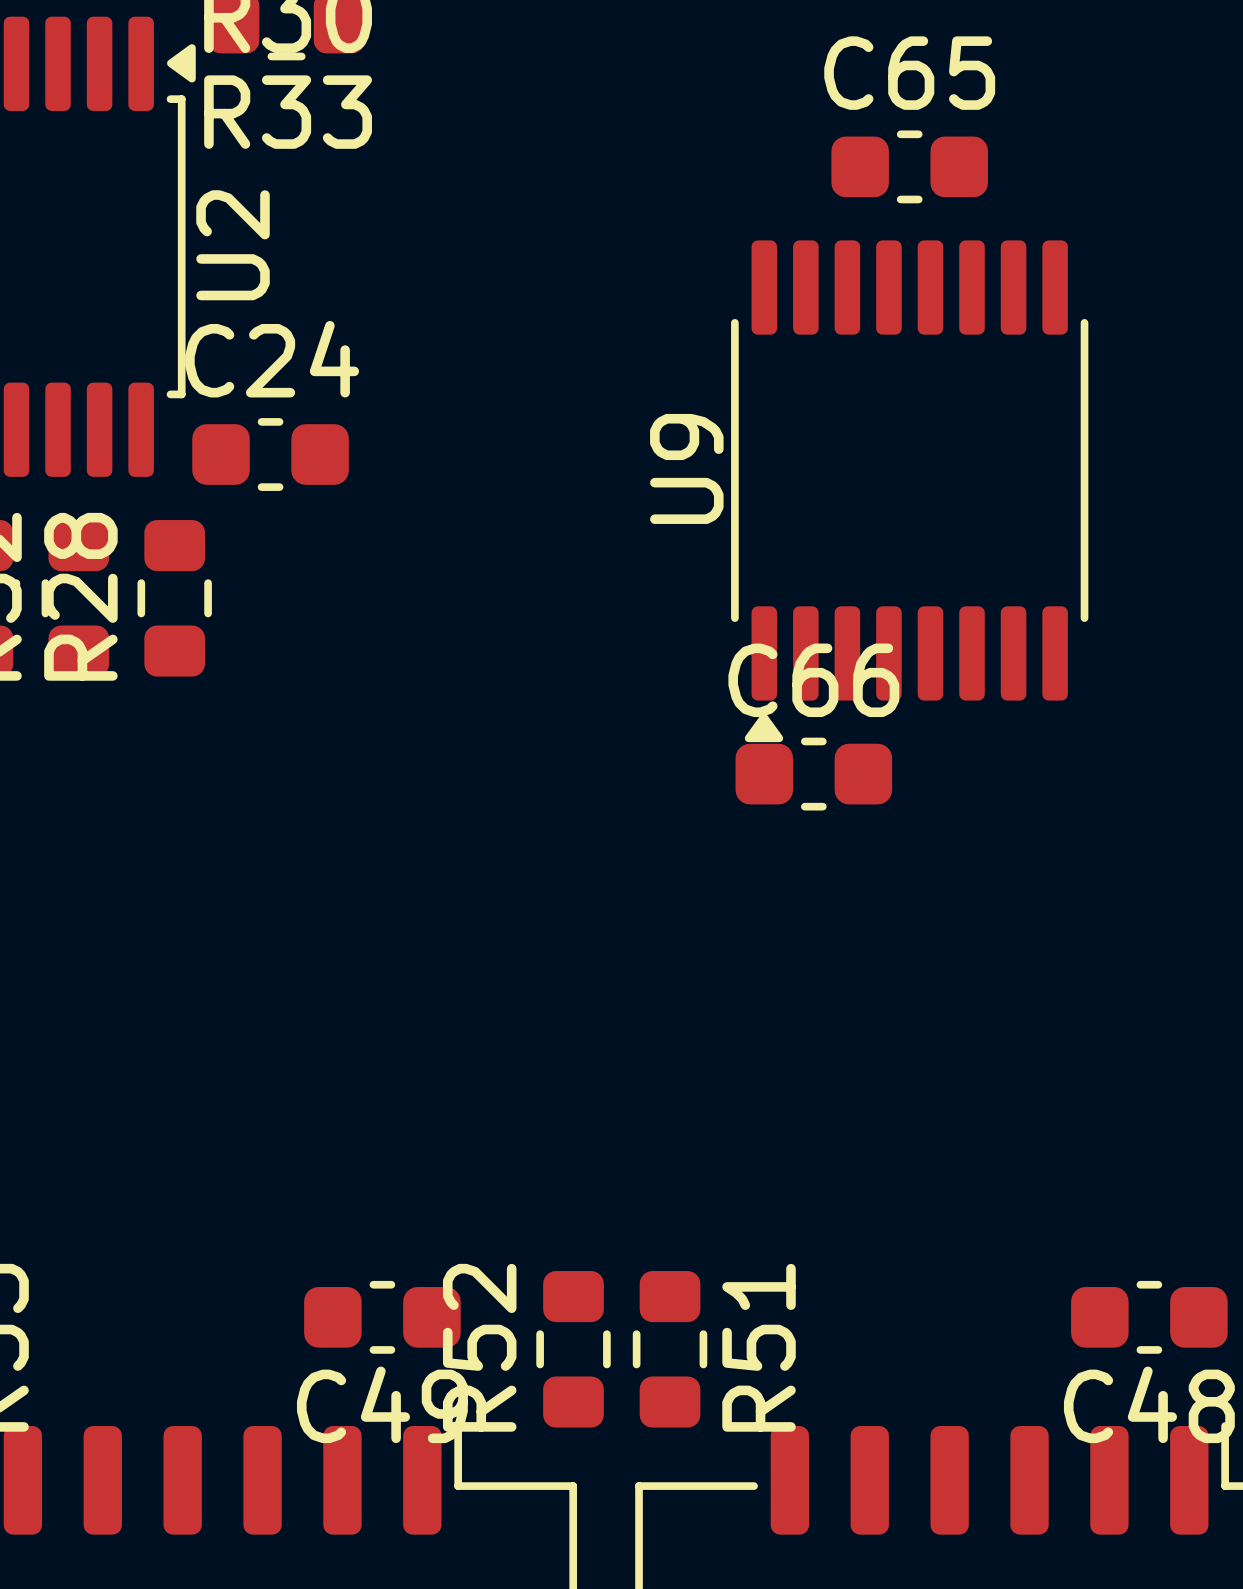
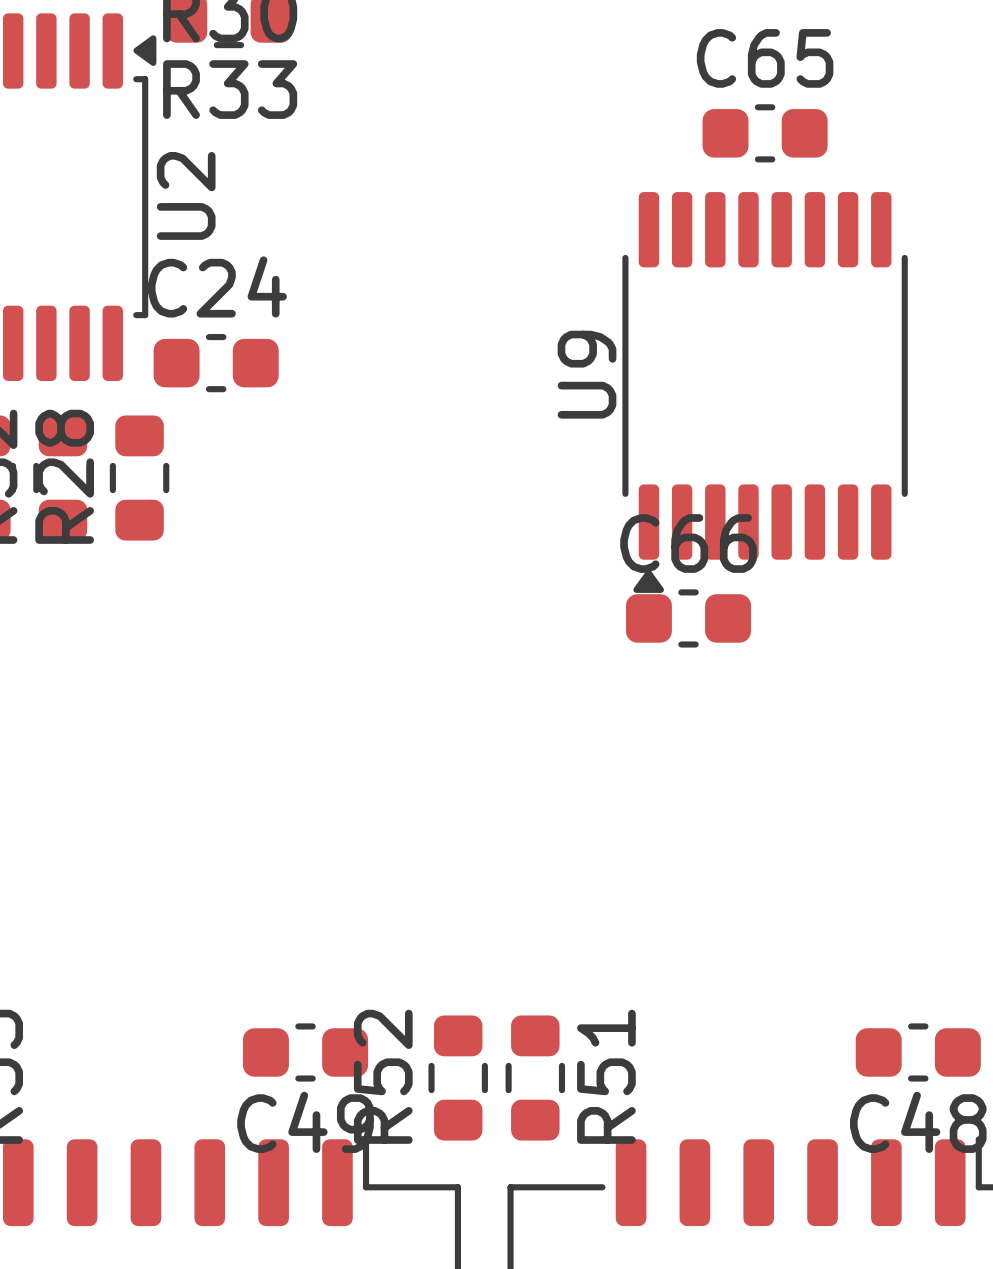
C65 position: (909, 166) -> (765, 133)
U9 position: (909, 491) -> (765, 392)
C66 position: (813, 774) -> (688, 618)

